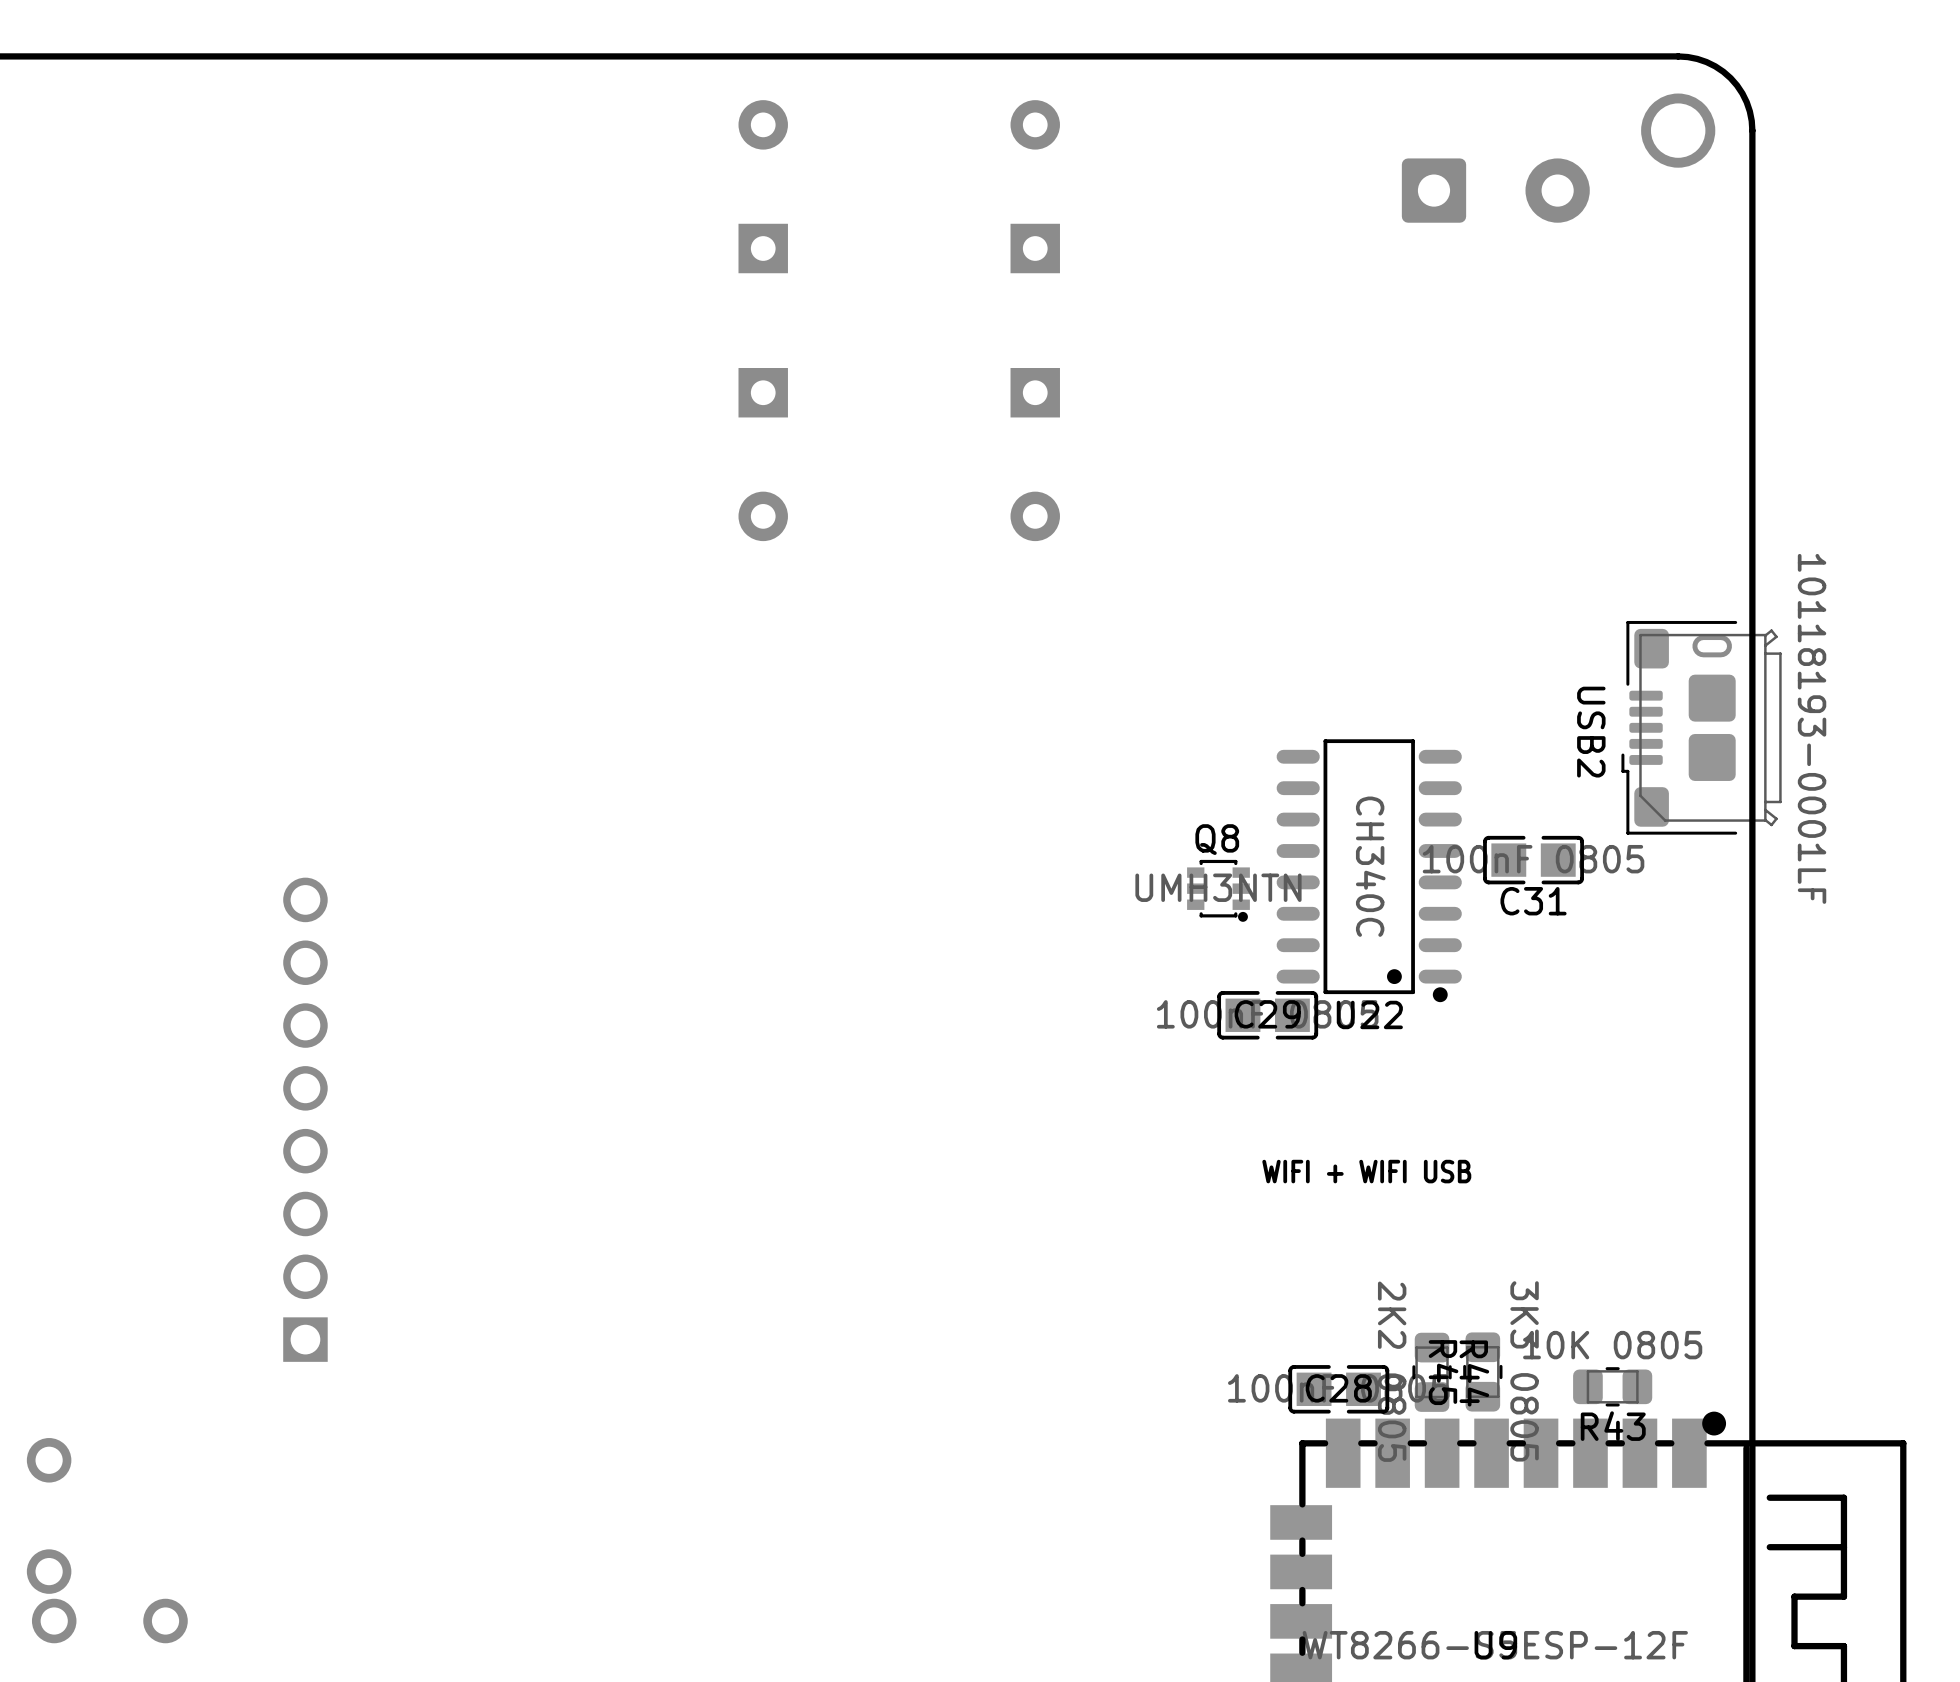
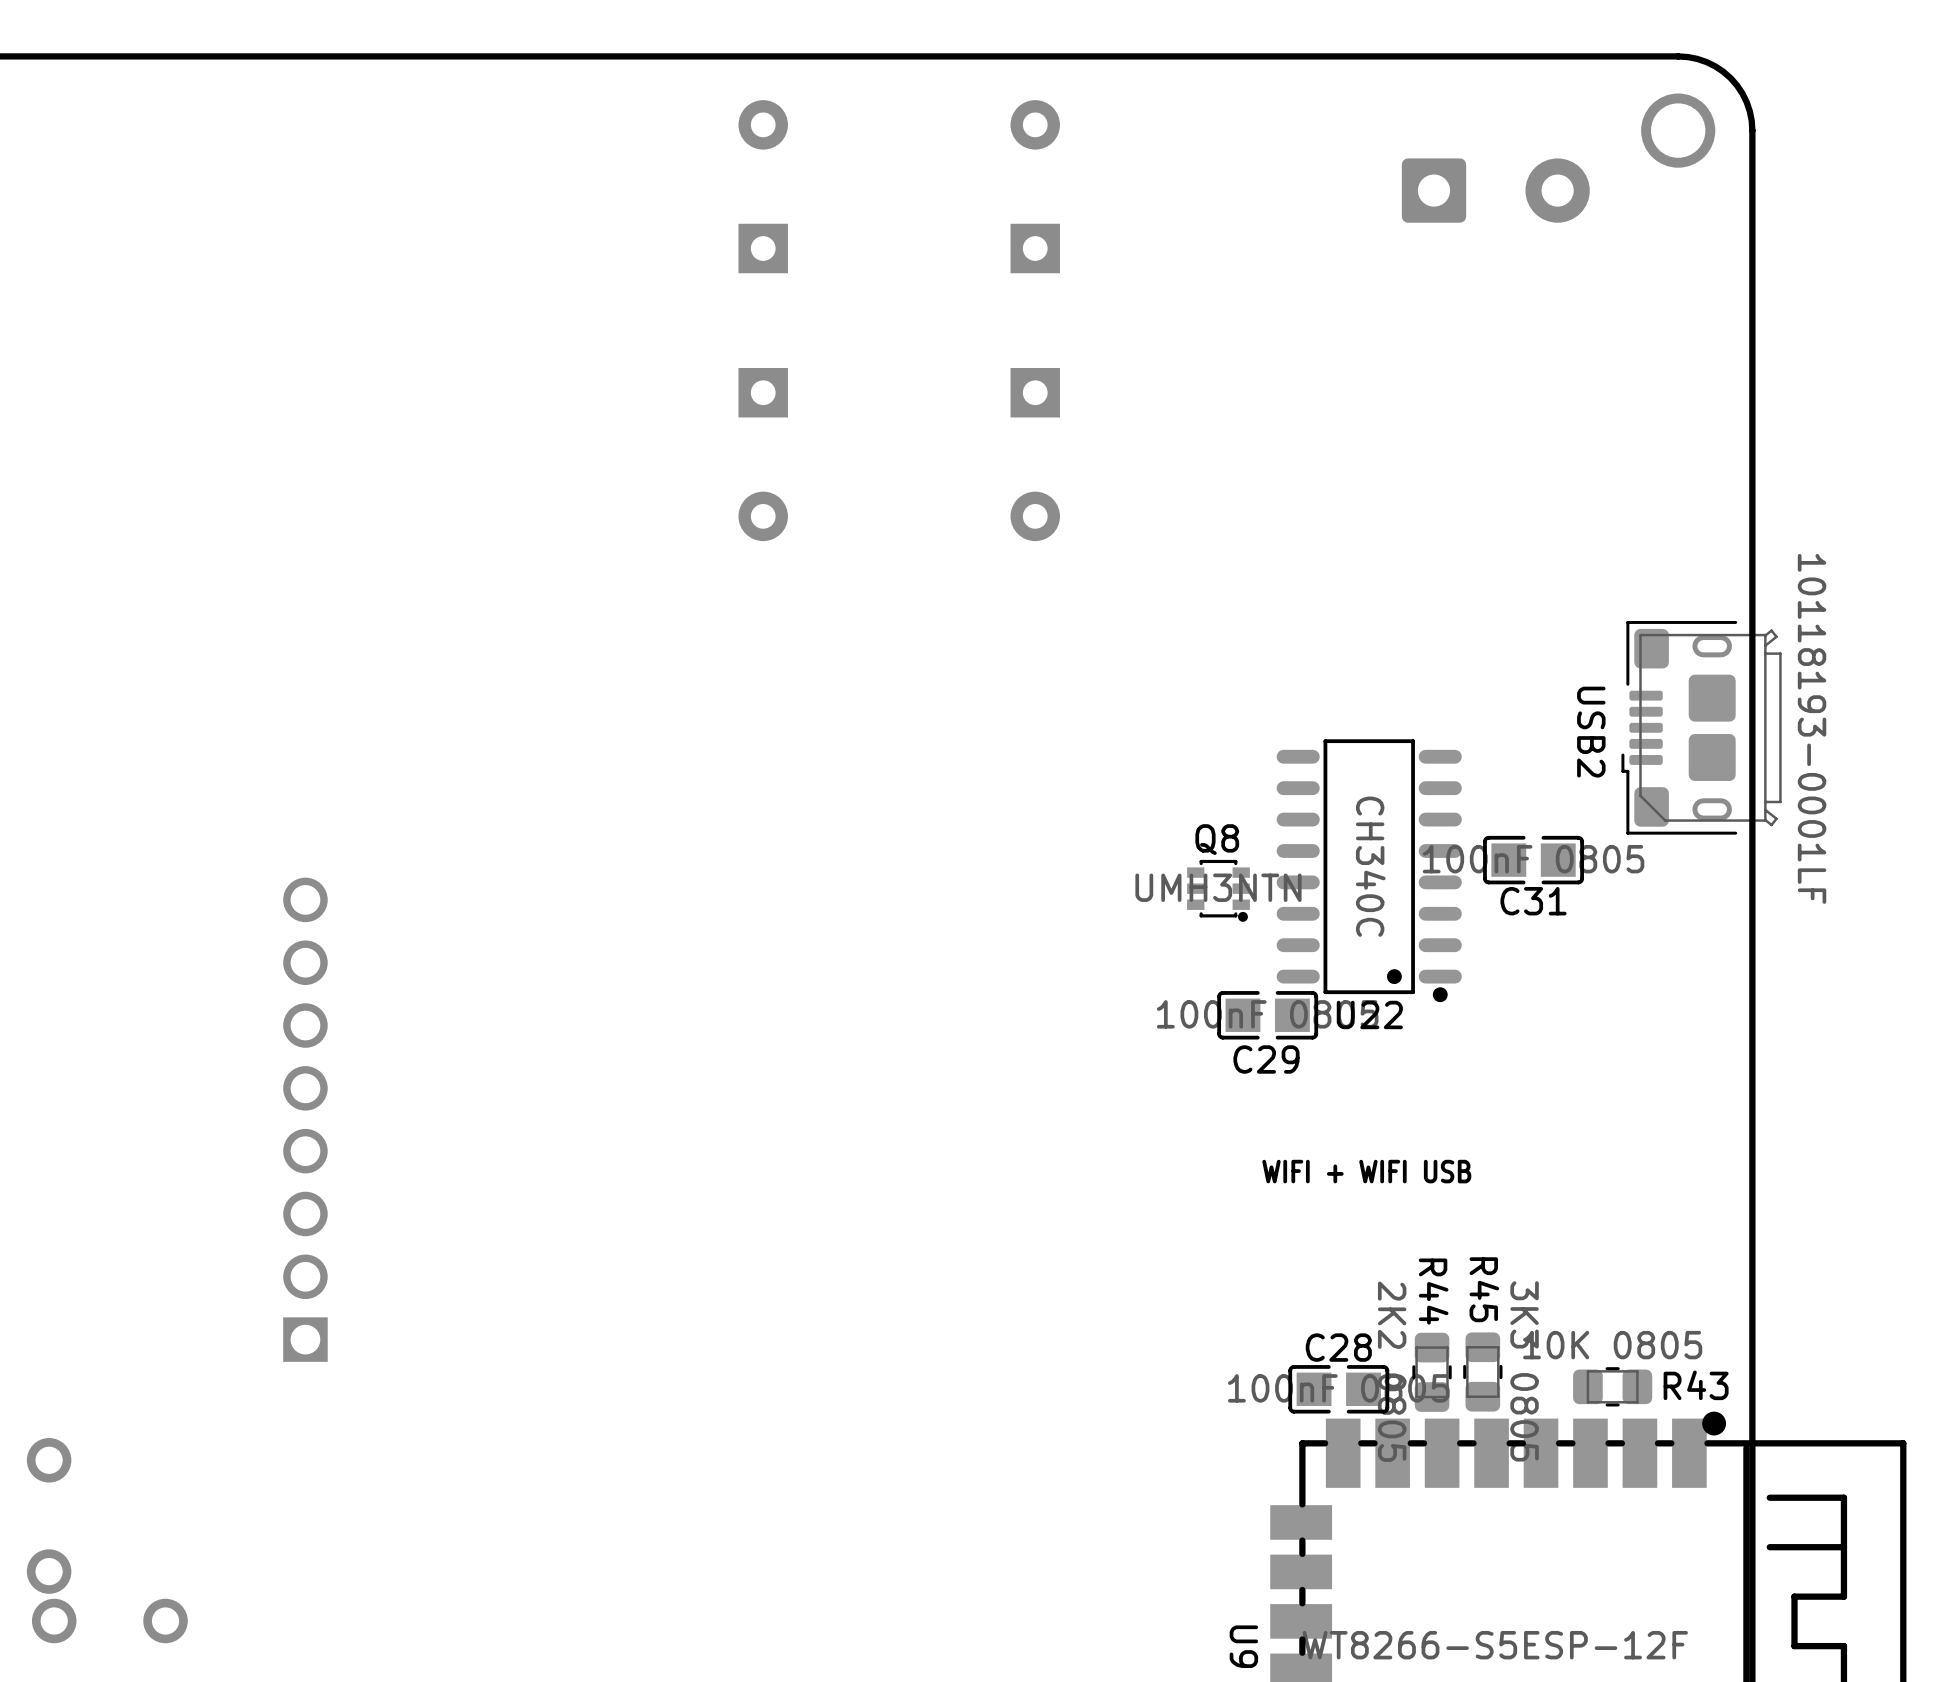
USB2 footprint: [1621, 620, 1782, 835] -> [1621, 620, 1782, 835]
C29 name position: C29 (1267, 1014) -> C29 (1266, 1059)
R45 name position: R45 (1443, 1372) -> R45 (1484, 1289)
R44 name position: R44 (1474, 1373) -> R44 (1433, 1291)
C28 name position: C28 (1338, 1388) -> C28 (1338, 1347)
R43 name position: R43 (1613, 1426) -> R43 (1696, 1385)
U9 name rotation: 0° (1495, 1645) -> 90° clockwise (1243, 1646)
U9 name position: U9 (1495, 1645) -> U9 (1243, 1646)

